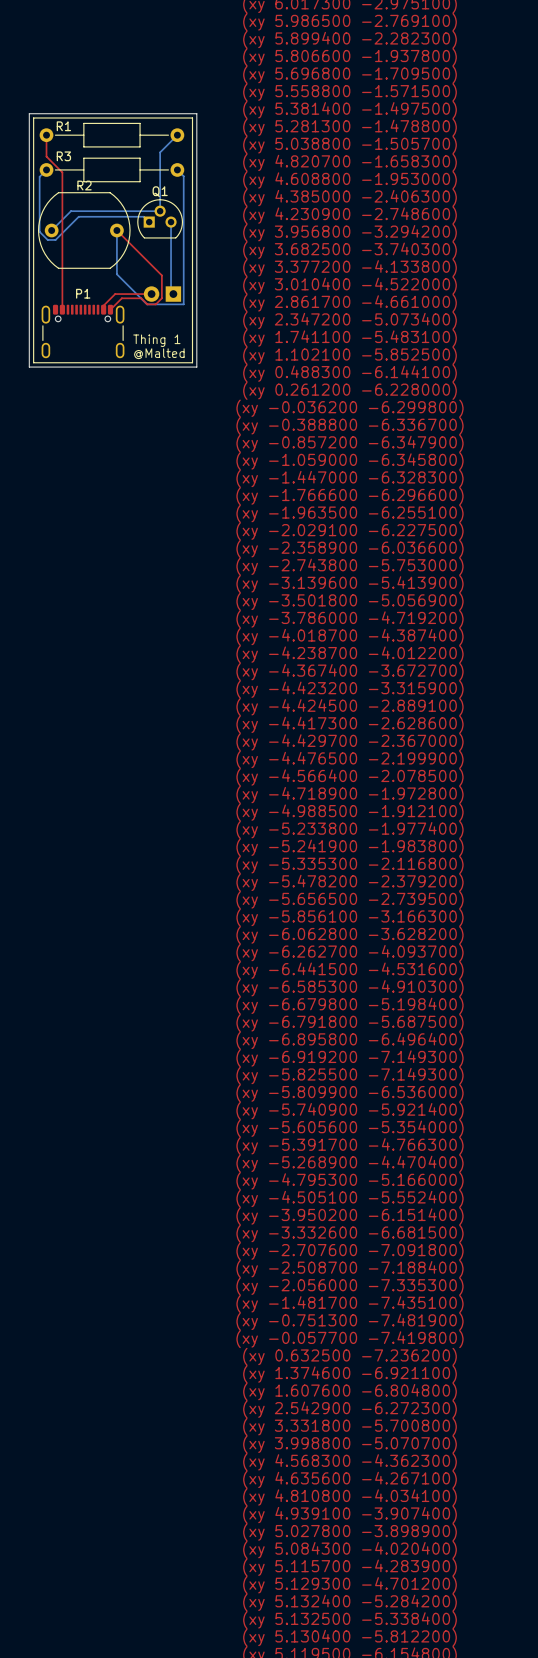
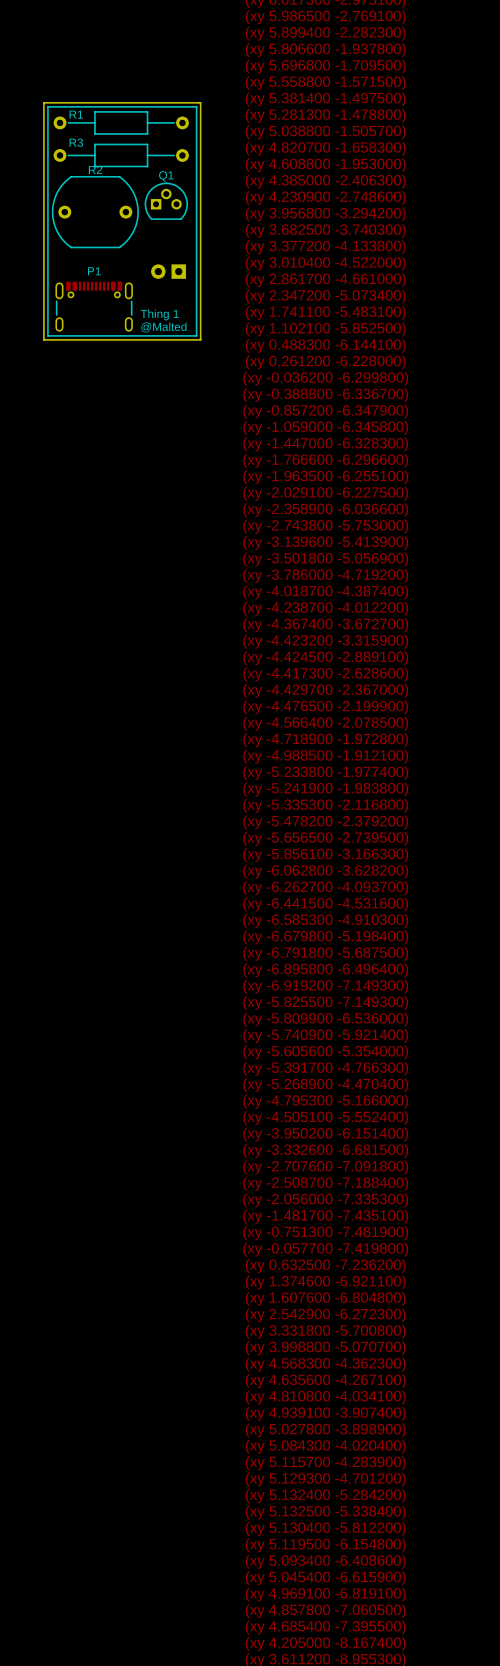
top track: (46, 135) (46, 156) (62, 172) (62, 309) -> none
bottom track: (177, 135) (160, 152) (160, 211) (70, 211) (51, 230) -> none
bottom track: (46, 169) (39, 176) (39, 231) (47, 239) (55, 239) (78, 216) (143, 216) (149, 222) -> none
bottom track: (177, 169) (183, 176) (183, 304) (147, 304) (116, 274) (116, 230) -> none
bottom track: (171, 222) (171, 291) (173, 294) -> none
top track: (116, 230) (161, 275) (161, 298) (155, 304) (147, 304) (141, 298) (121, 298) (110, 309) -> none
top track: (151, 294) (115, 294) (103, 305) (103, 309) -> none

